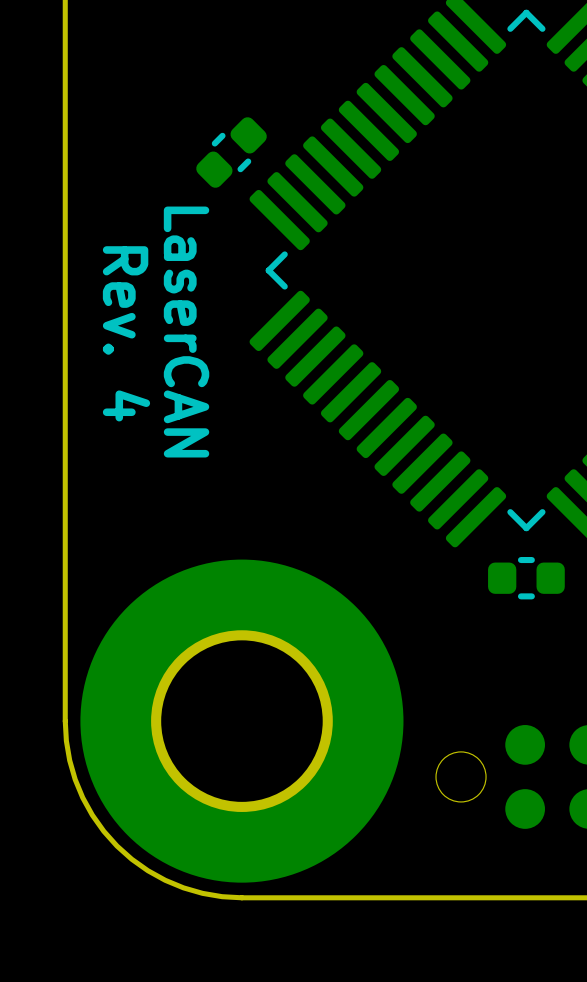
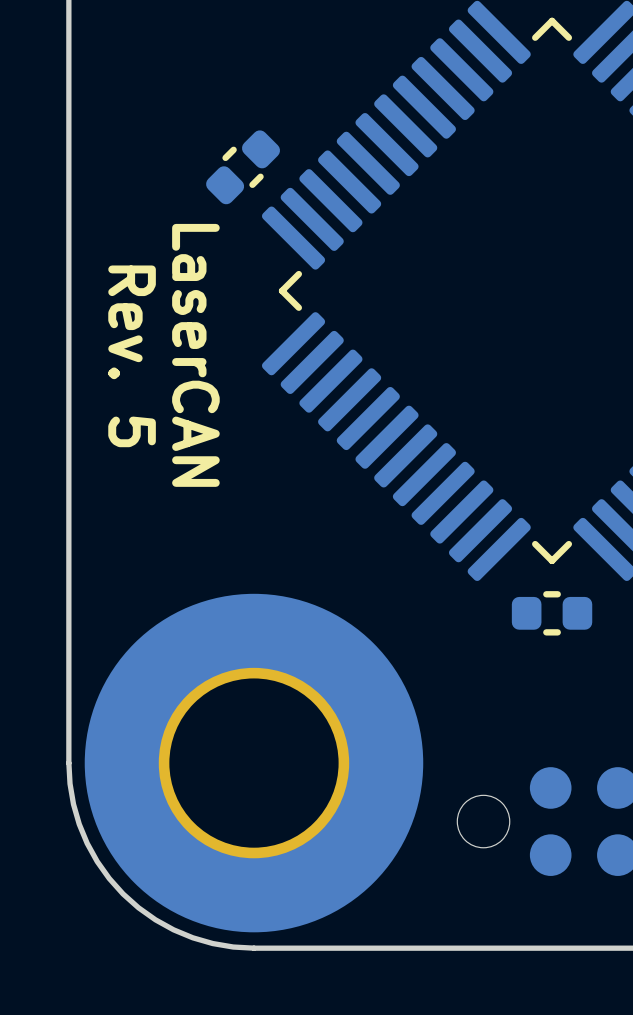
text: Rev. 4 (126, 333) -> Rev. 5 (132, 356)

